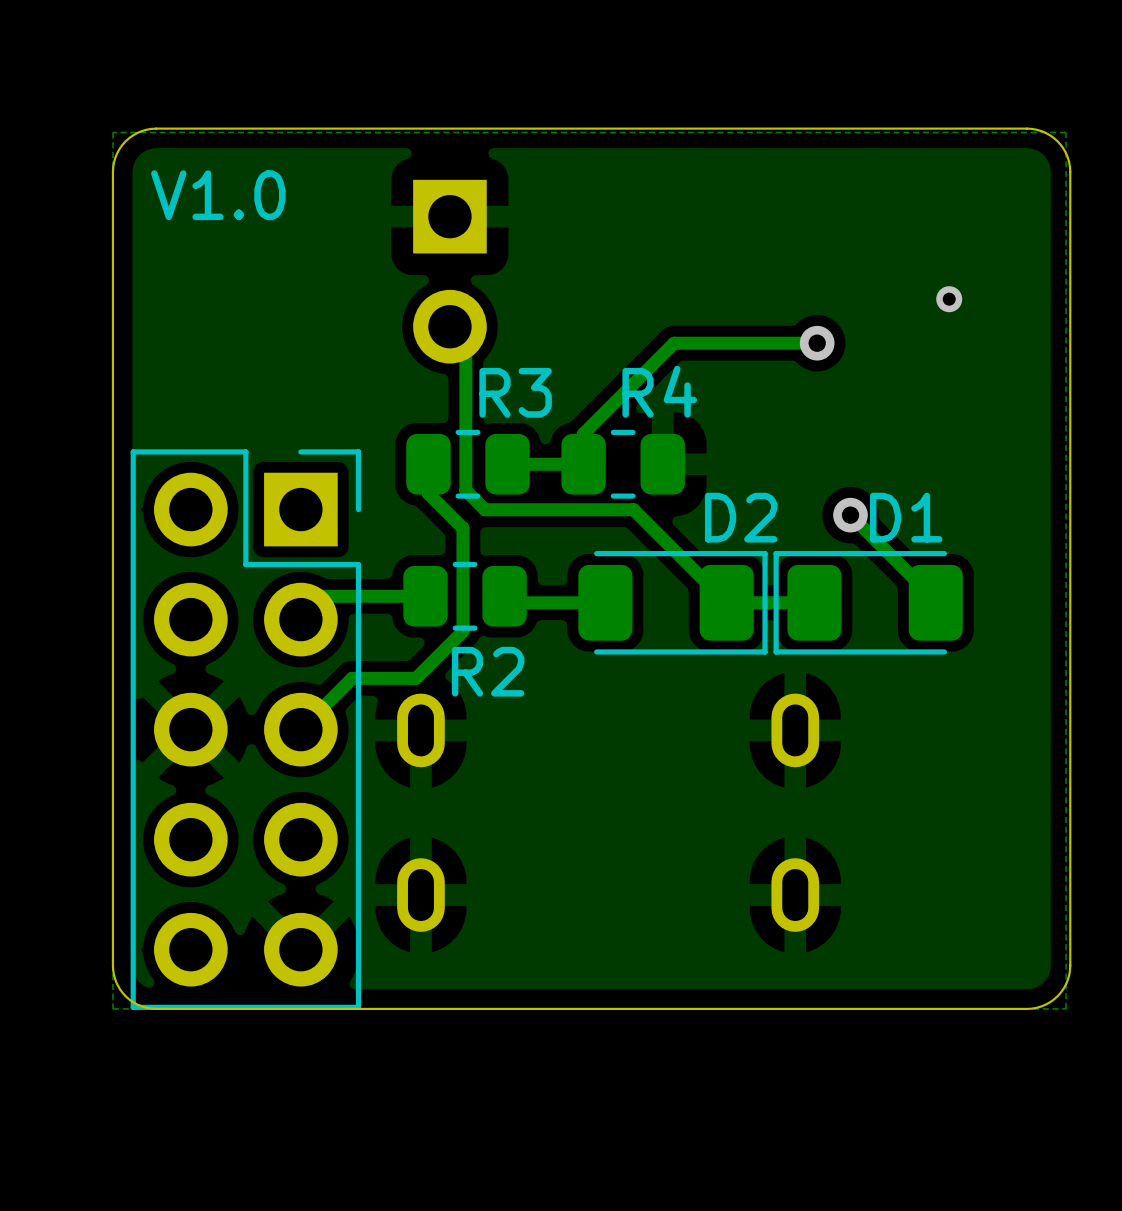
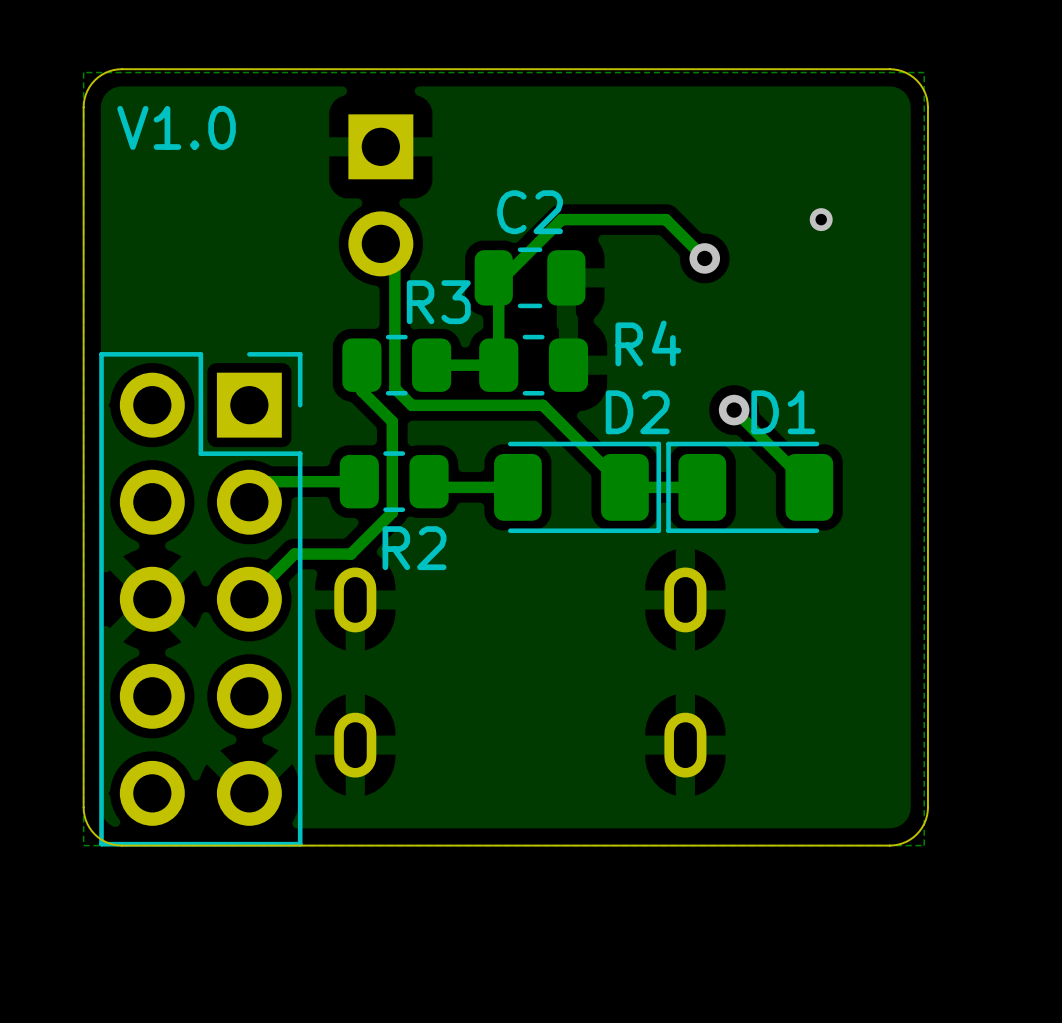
track: (817, 343) (674, 343) (583, 433) -> (704, 258) (665, 219) (561, 219) (498, 282) (498, 338)
C2: none -> (530, 277)
R4 name position: R4 (659, 391) -> R4 (648, 343)

